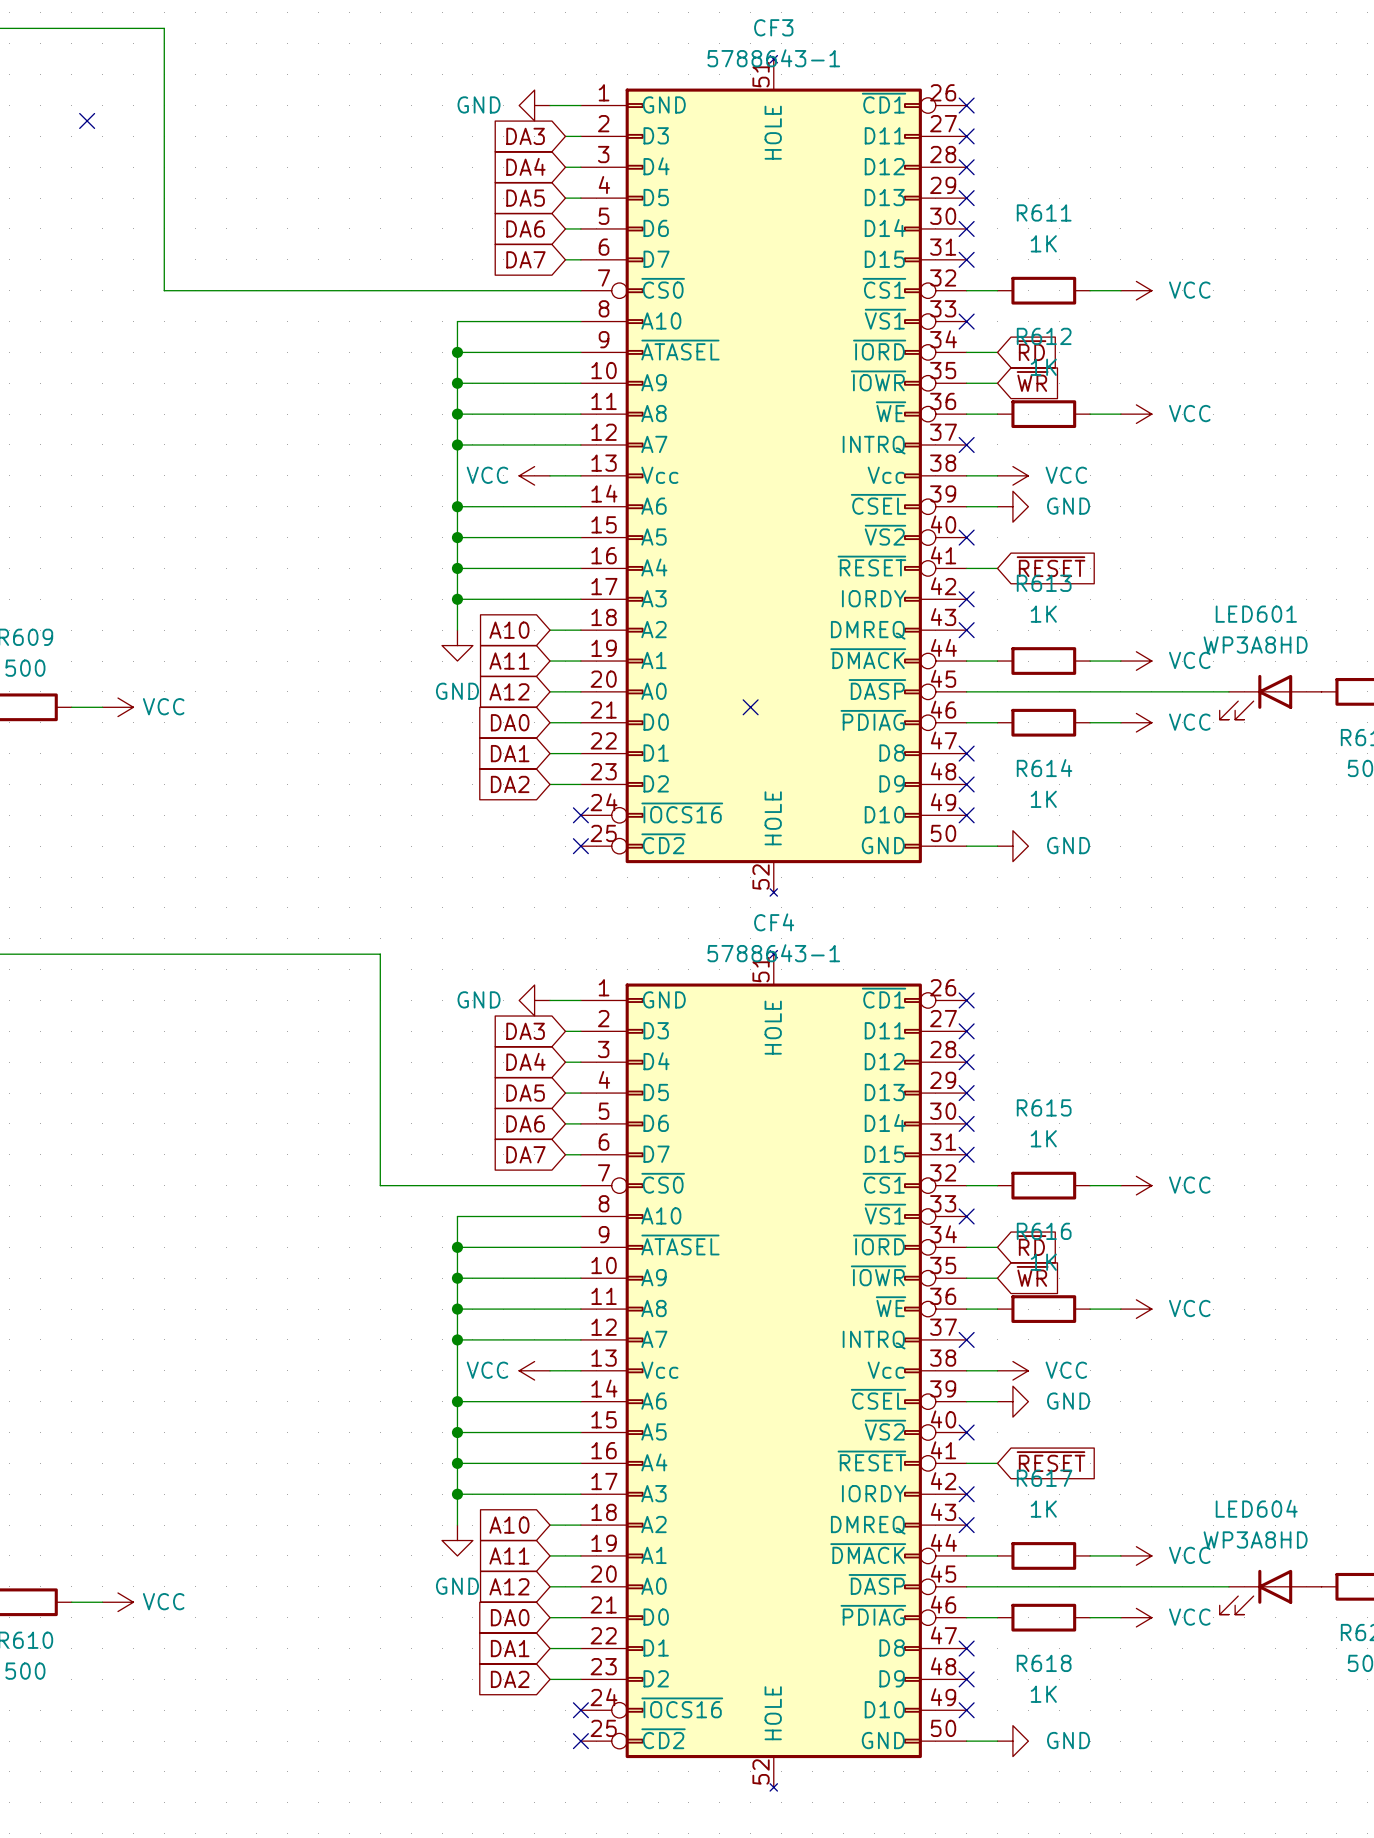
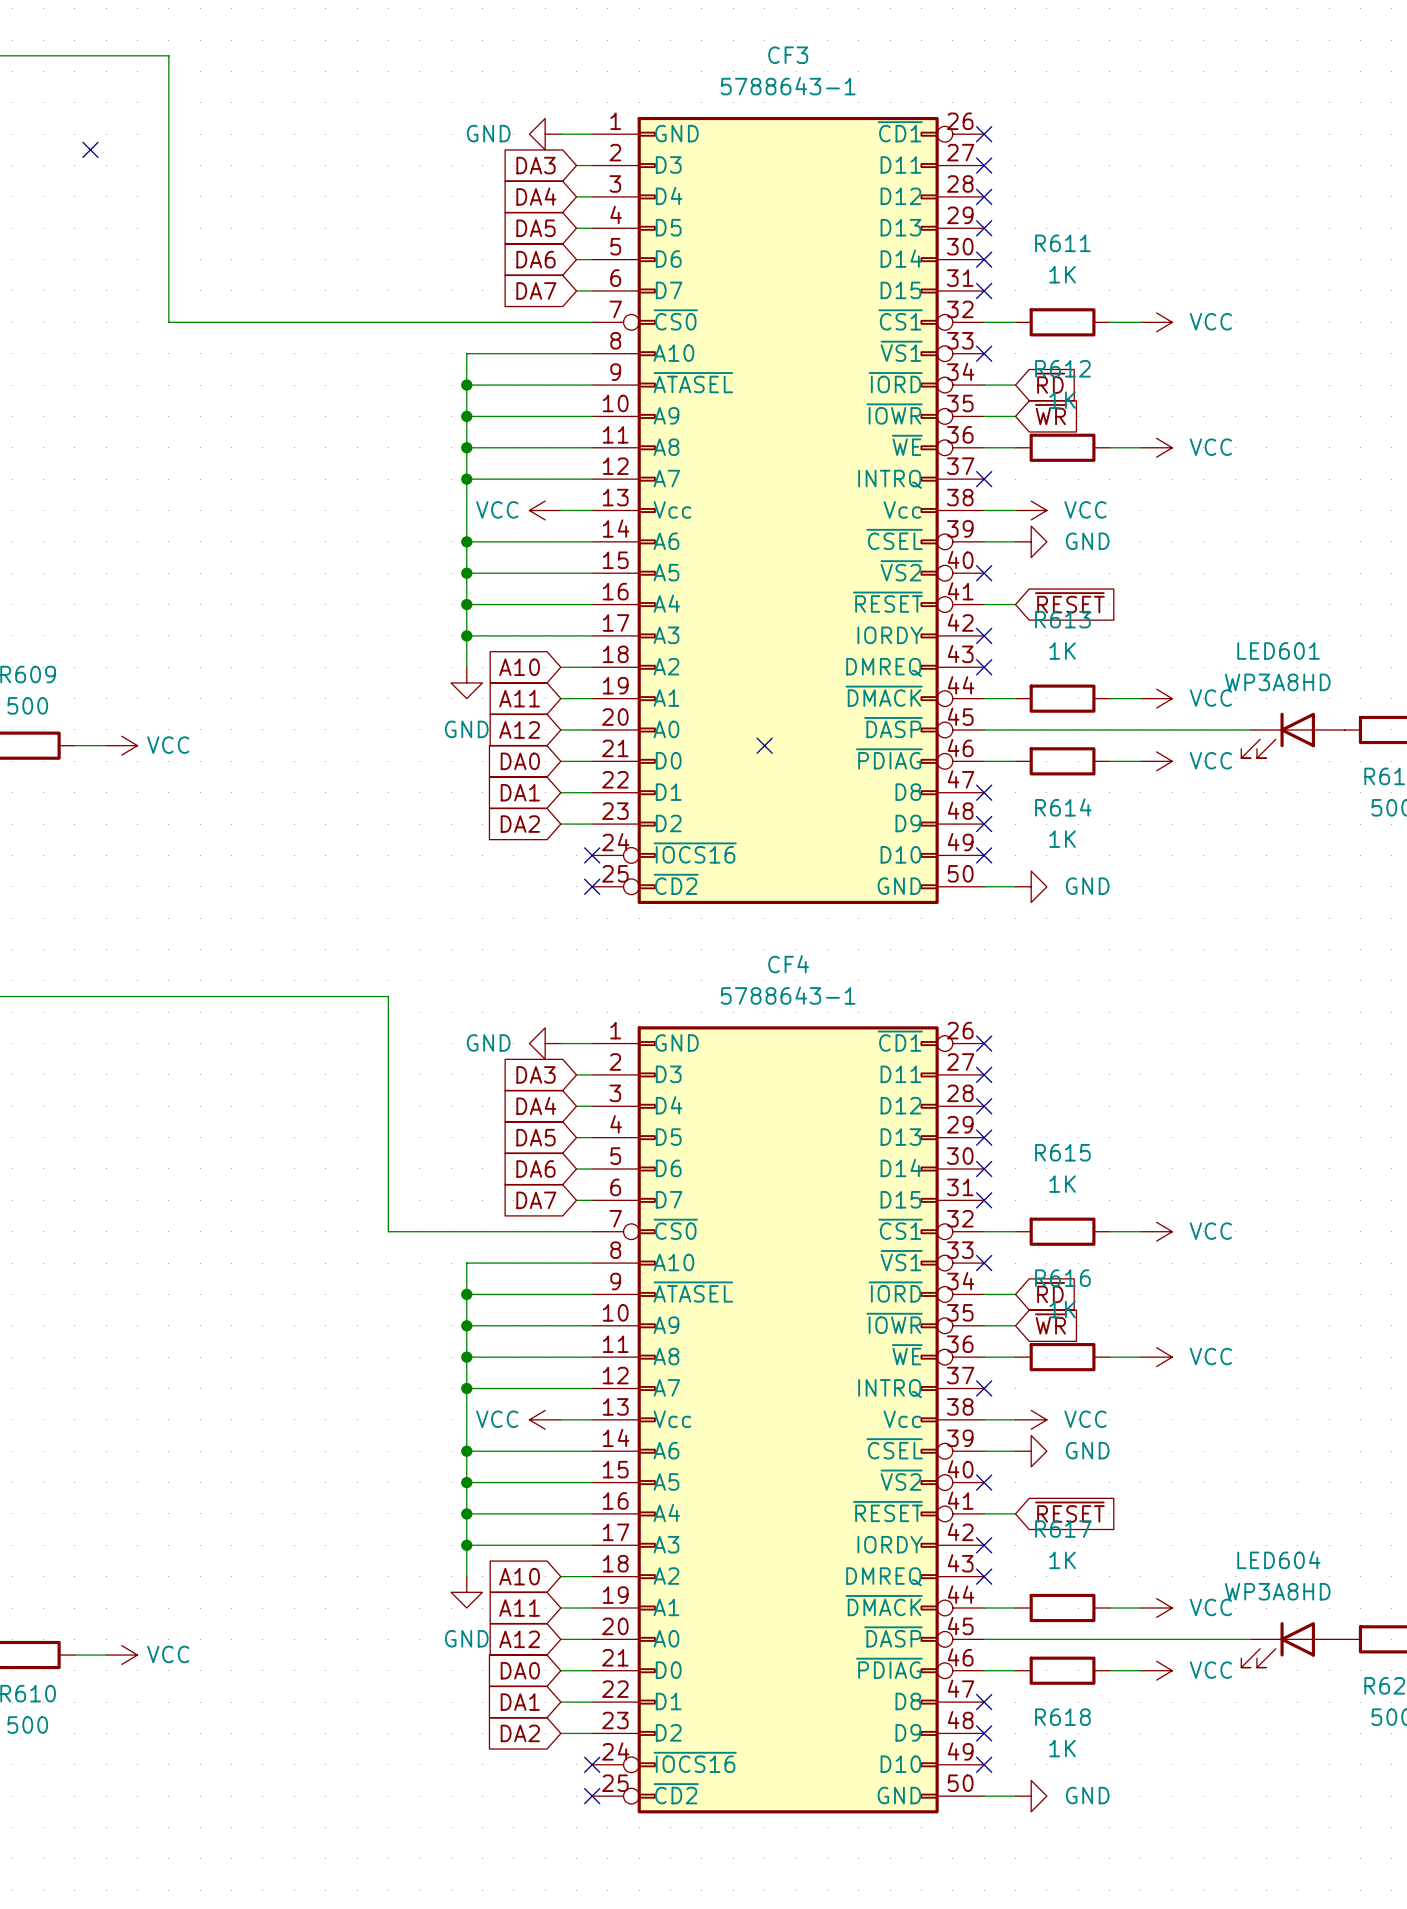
CF3 symbol: [580, 55, 967, 897] -> [592, 116, 985, 905]
CF4 symbol: [580, 950, 967, 1792] -> [592, 1026, 985, 1814]

